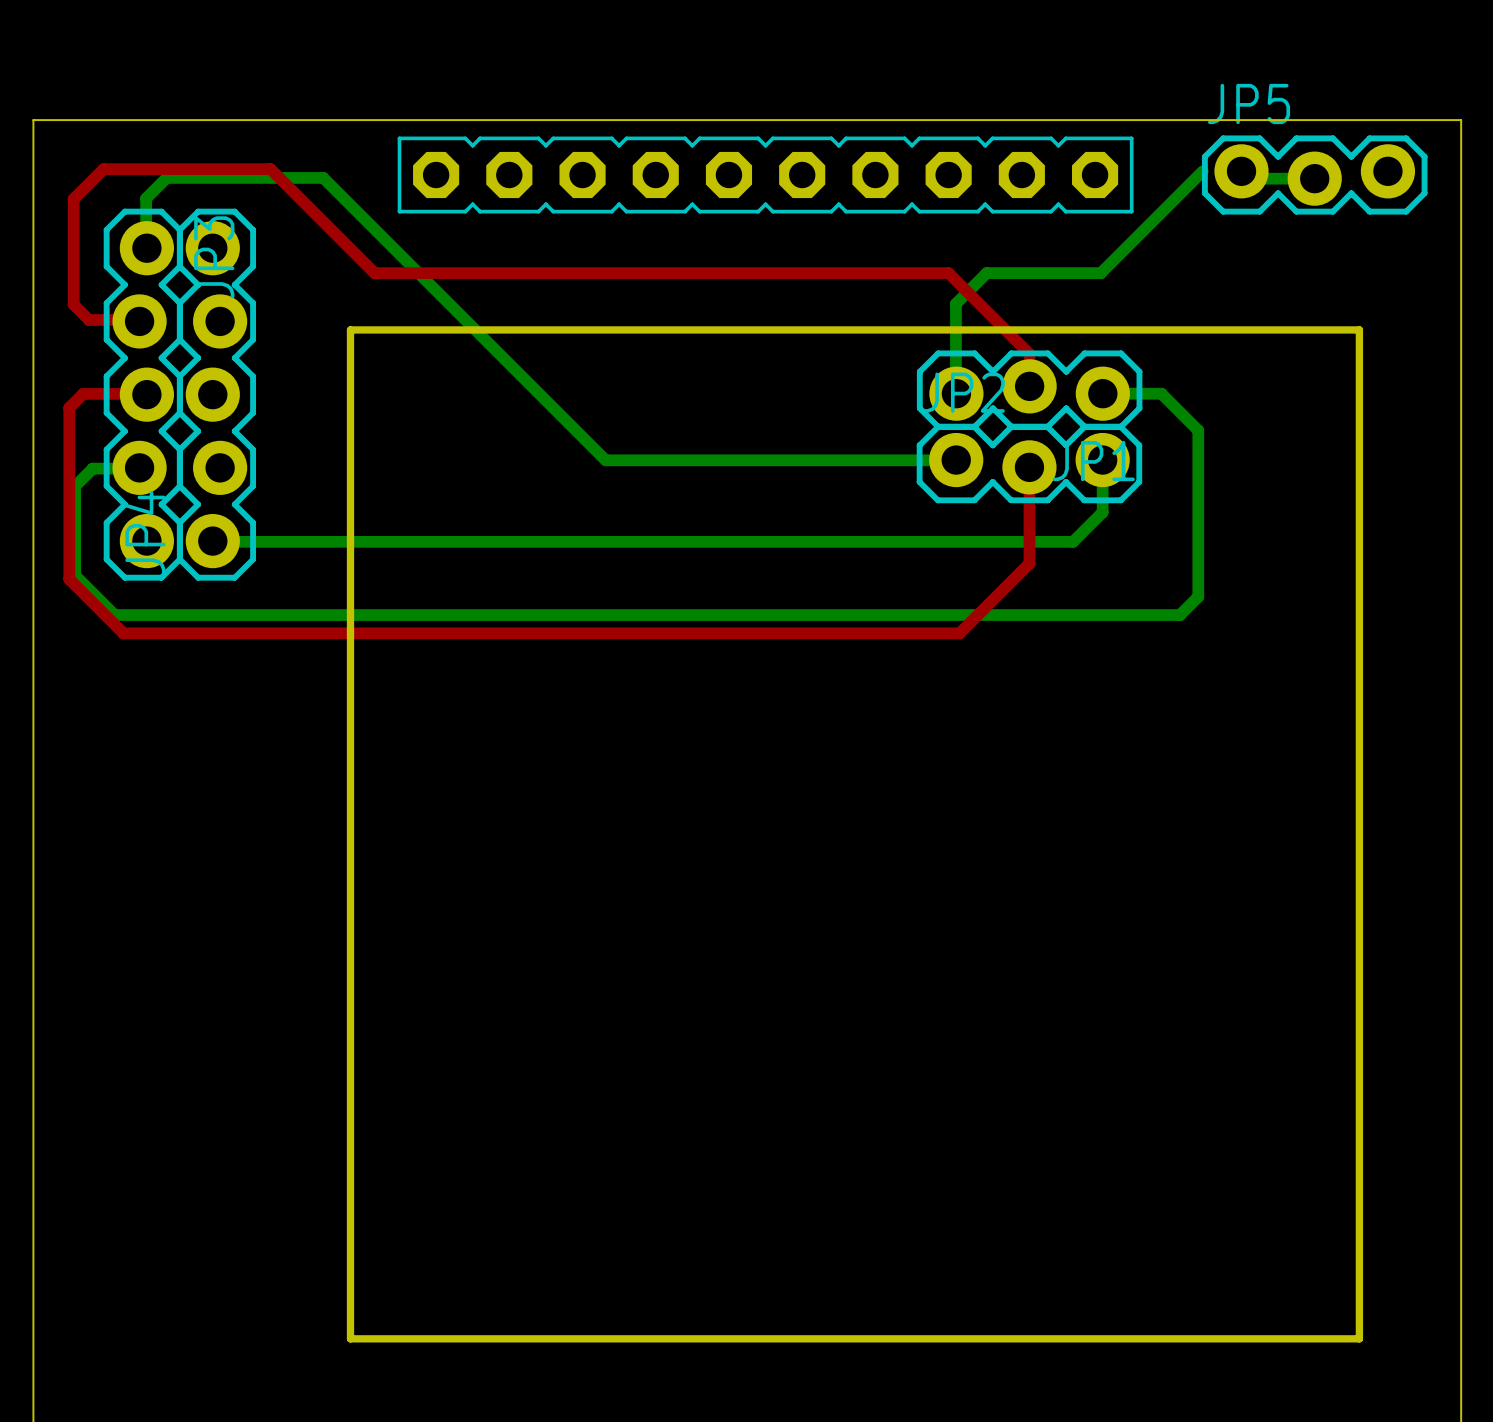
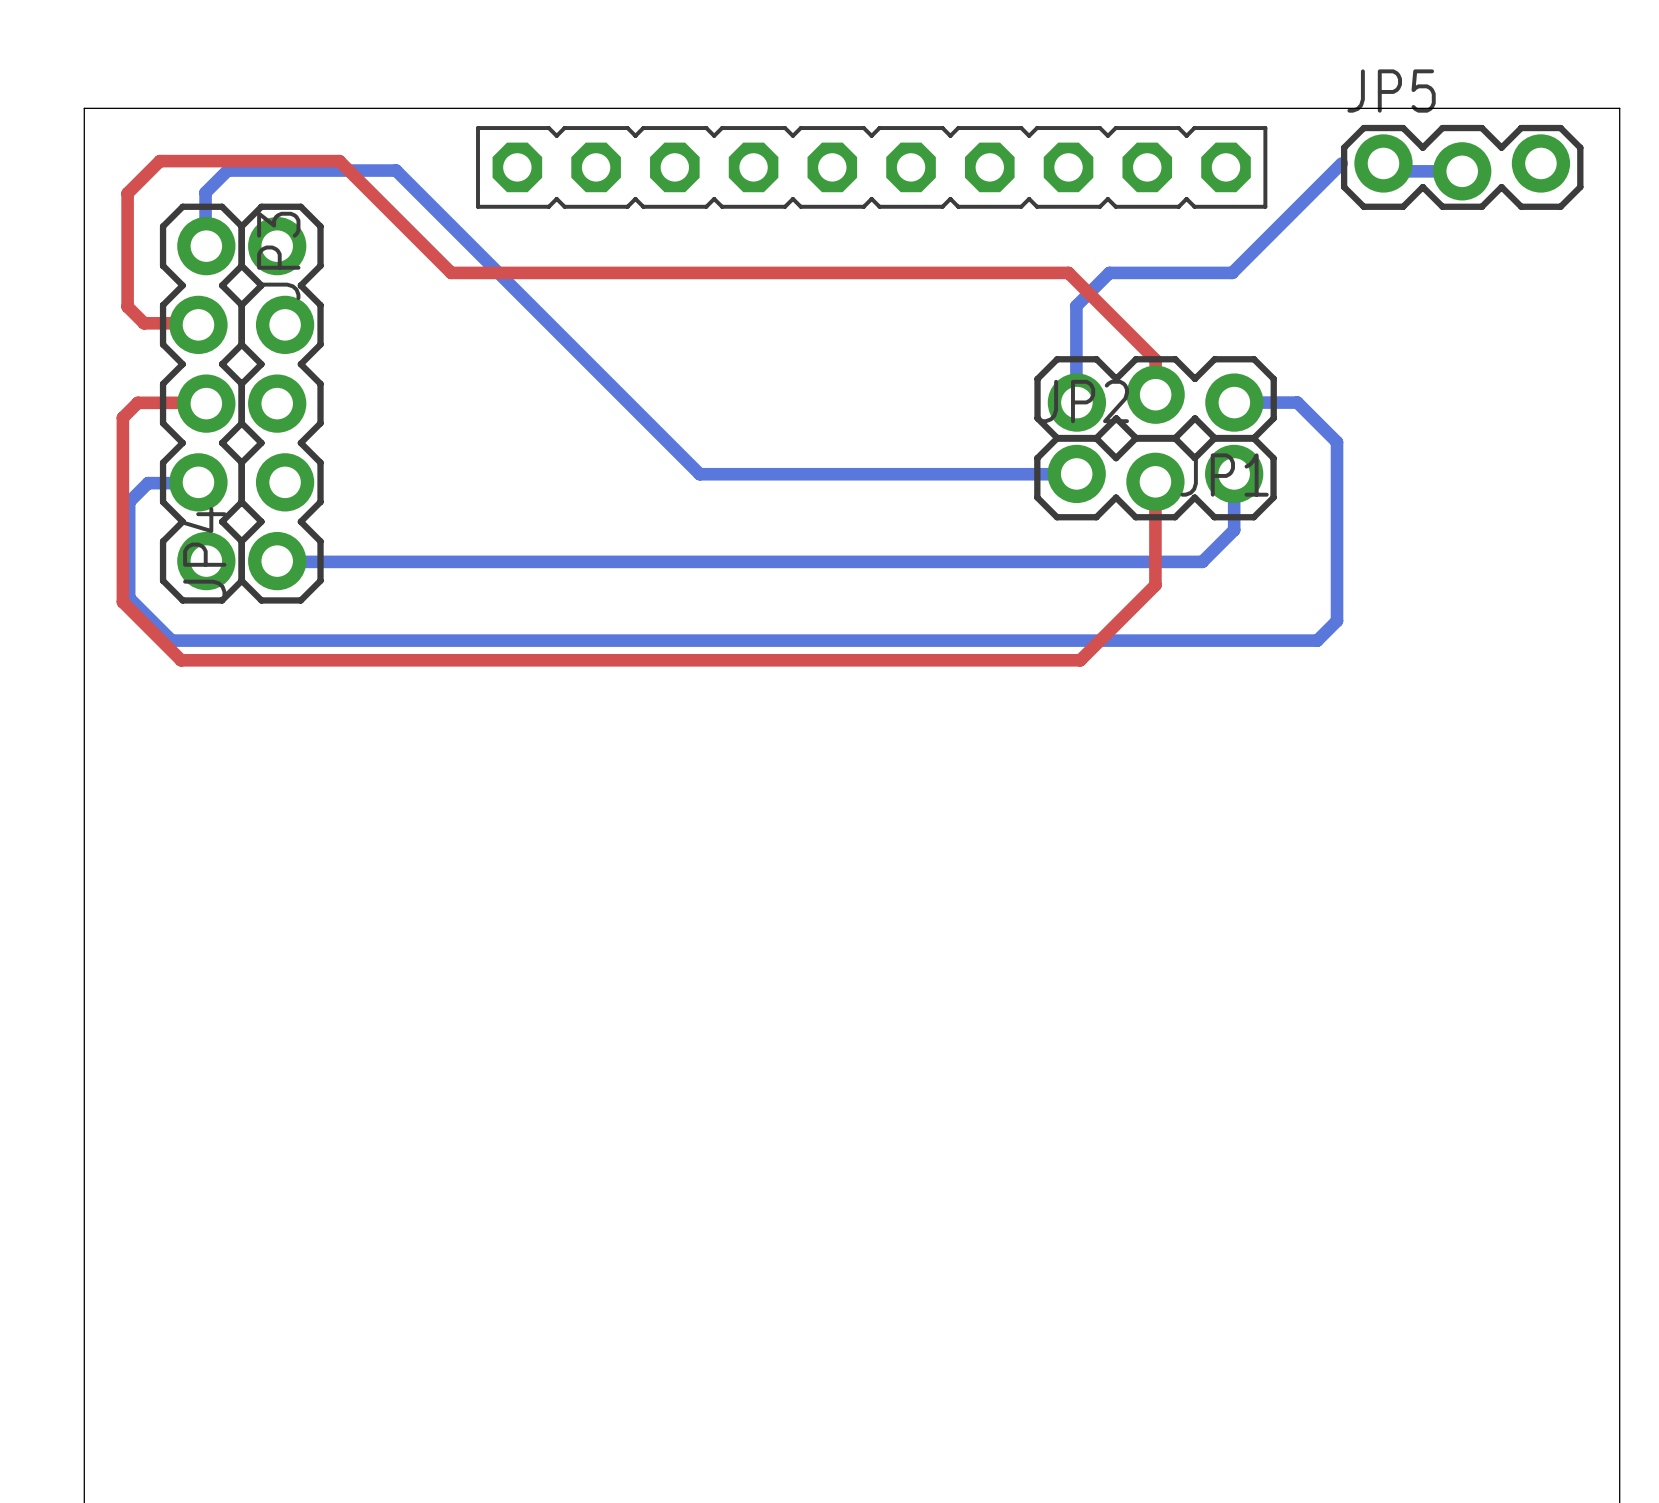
board edge: (350, 329) (1359, 329) (1359, 1338) (350, 1338) (350, 329) -> none

